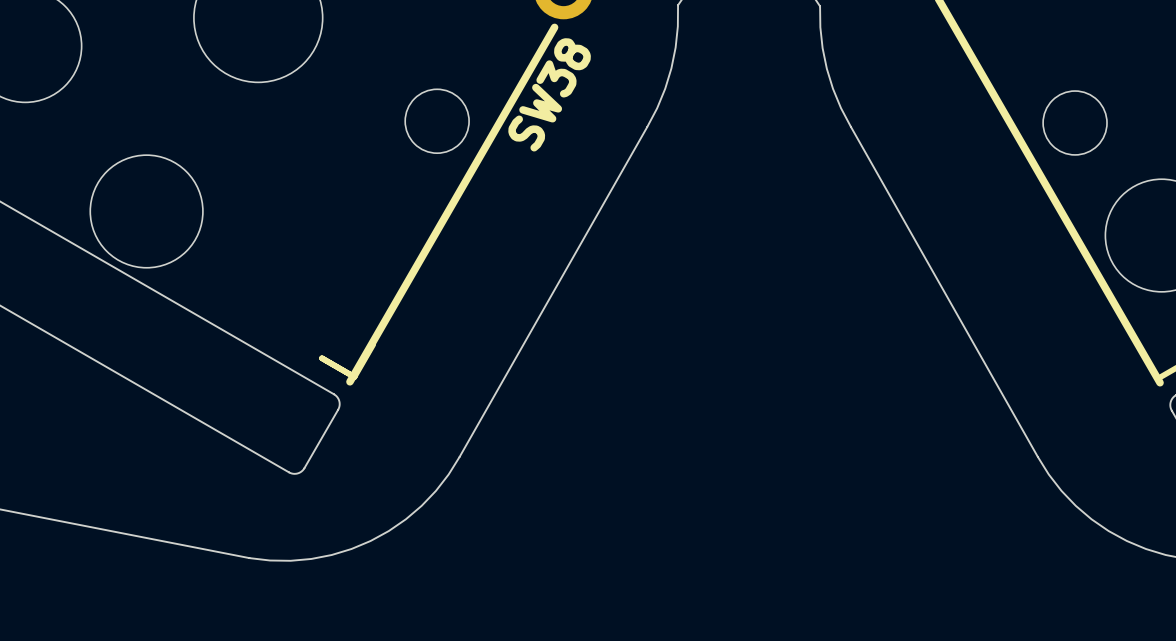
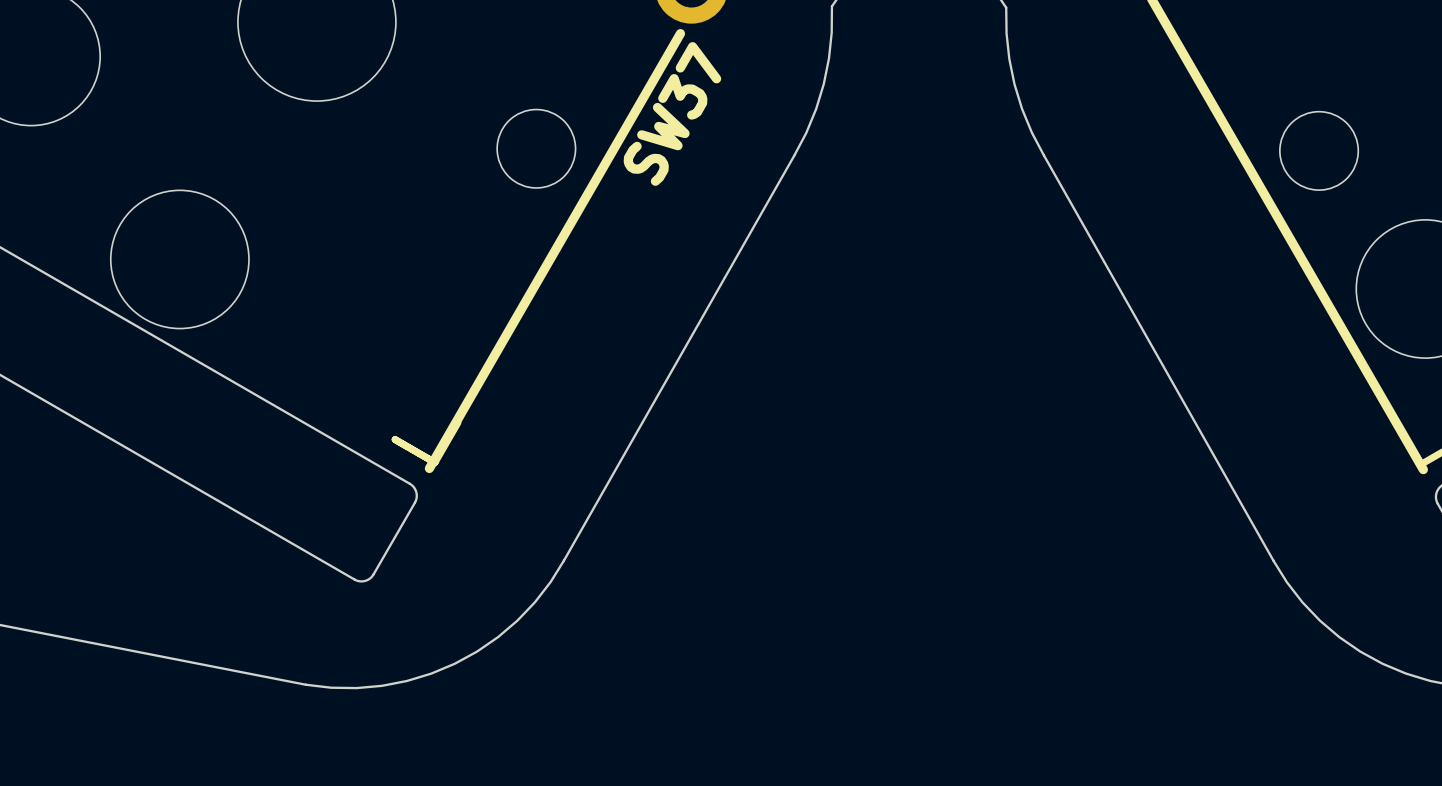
SW38 name: SW38 (549, 94) -> SW37 (672, 113)

